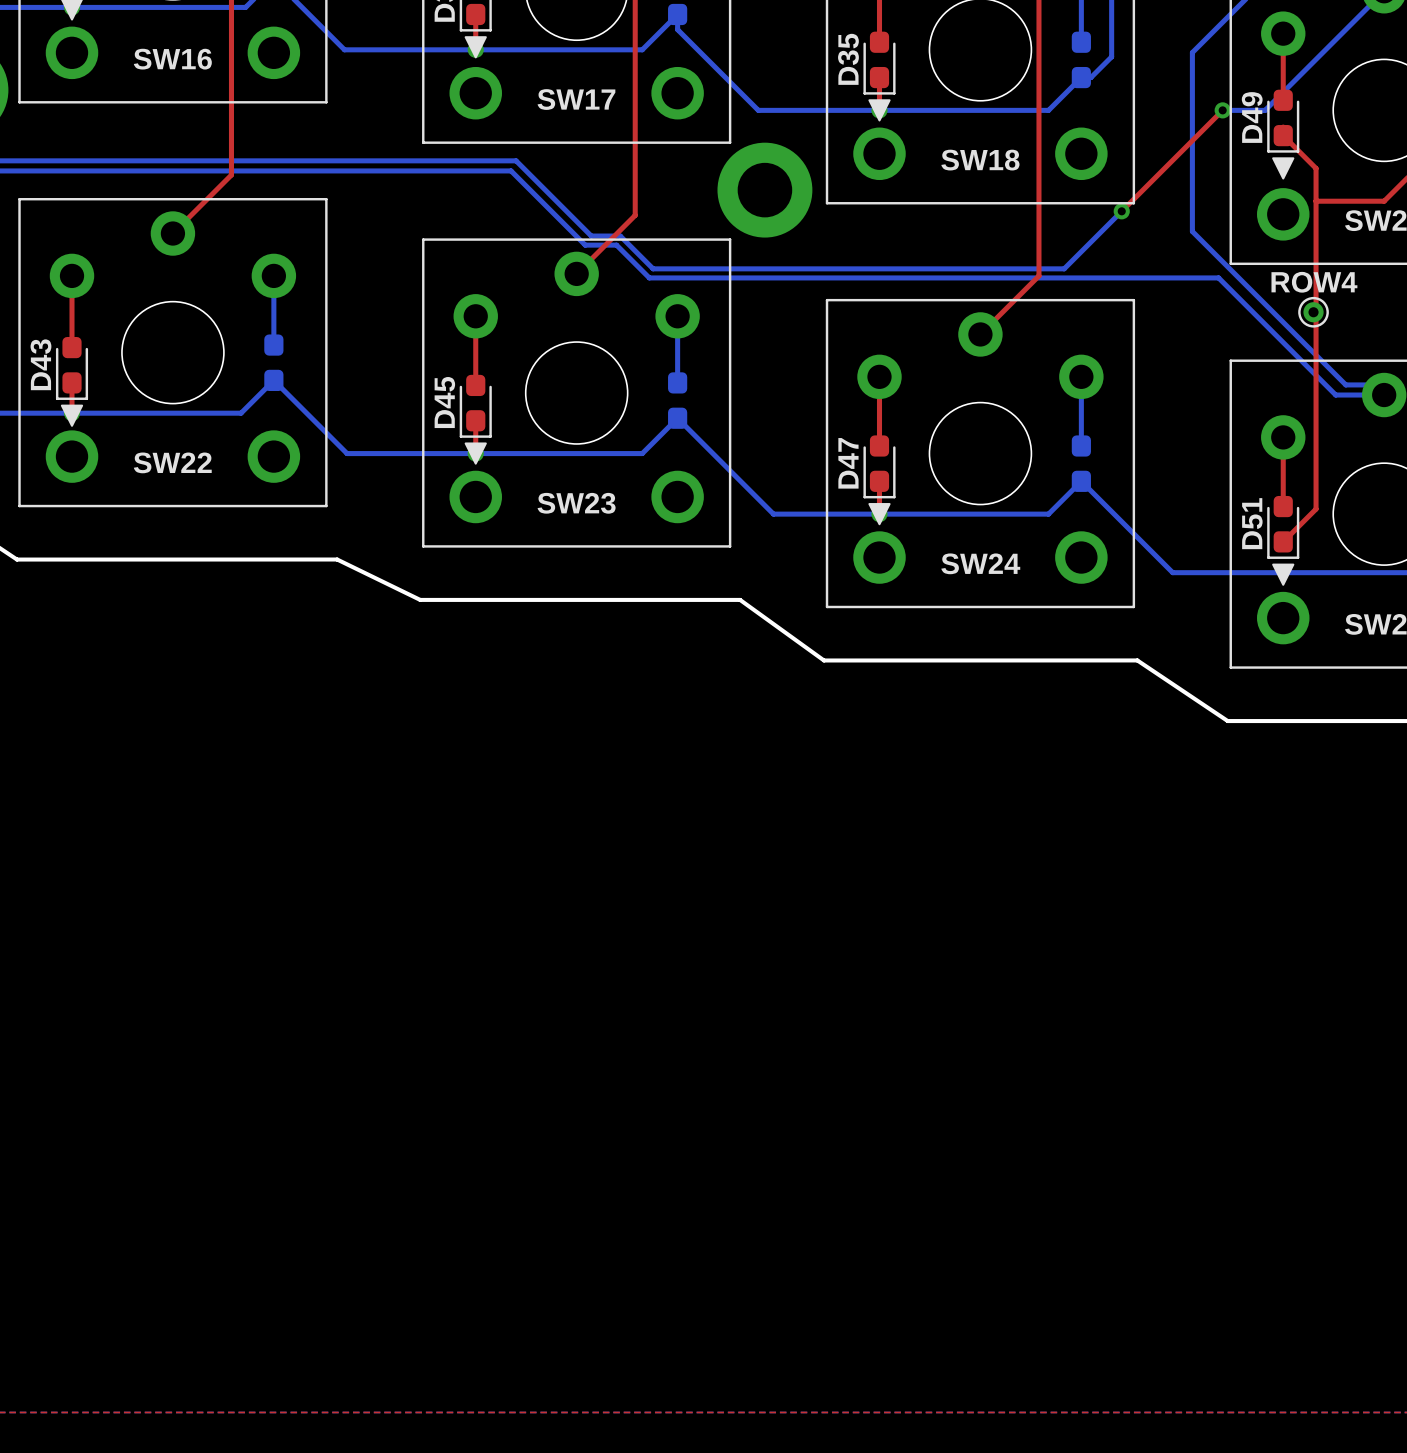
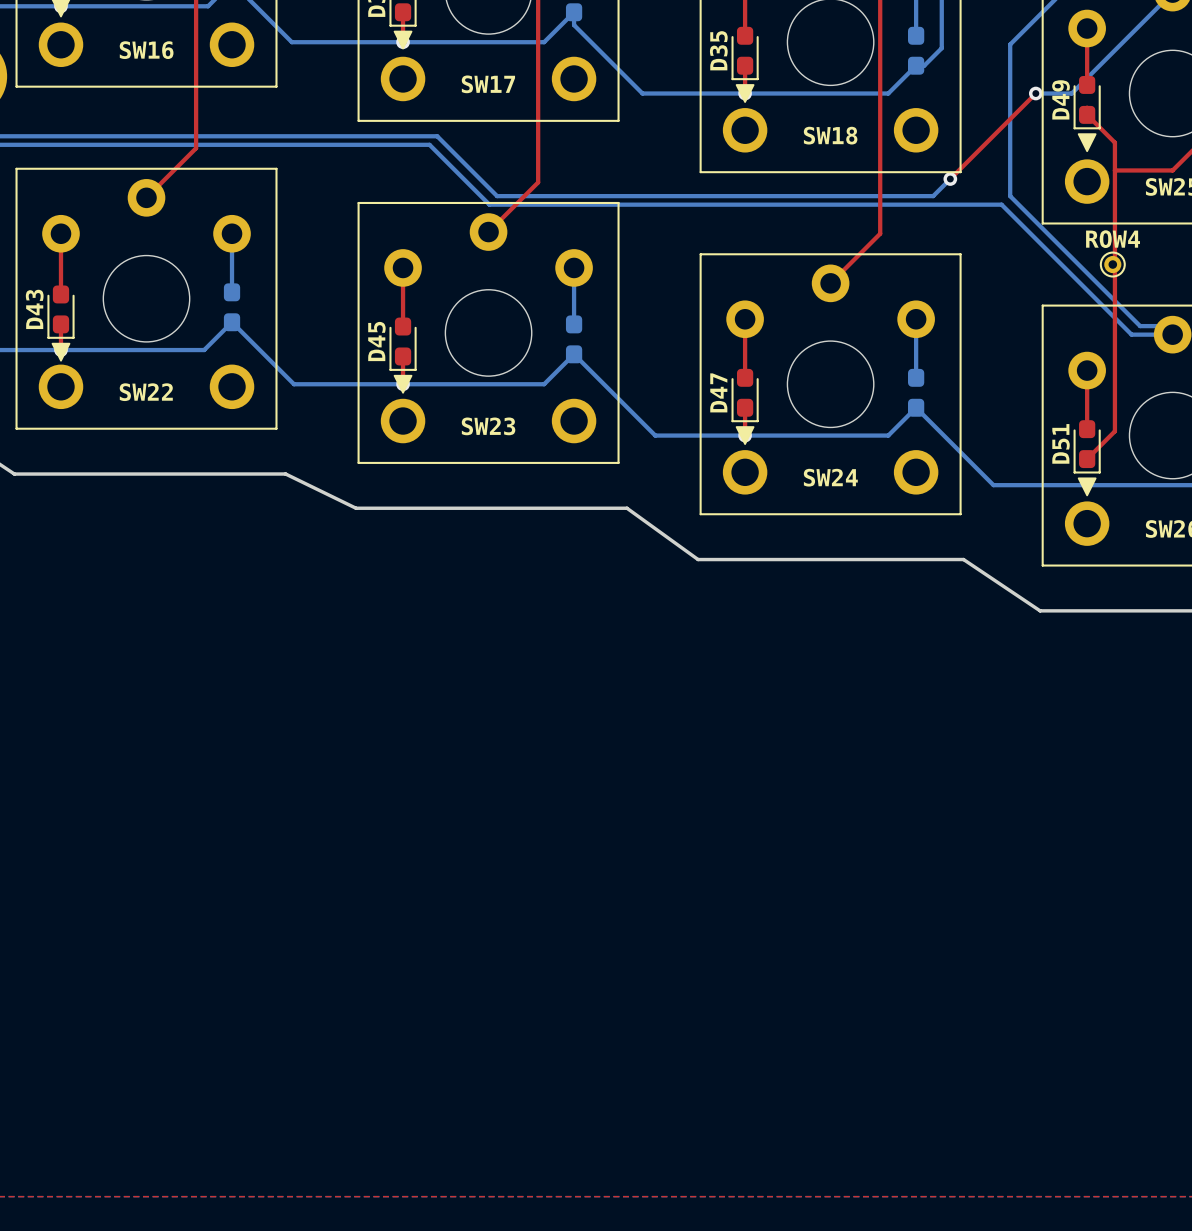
bottom track: (507, 170) (511, 170) (585, 245) (616, 245) (649, 277) (1218, 277) -> (429, 144) (489, 204) (1001, 204) (1032, 235)
part: (764, 190) -> none
bottom track: (586, 231) (591, 236) (620, 236) (653, 268) (1064, 268) (1101, 231) -> (497, 196) (933, 196)

